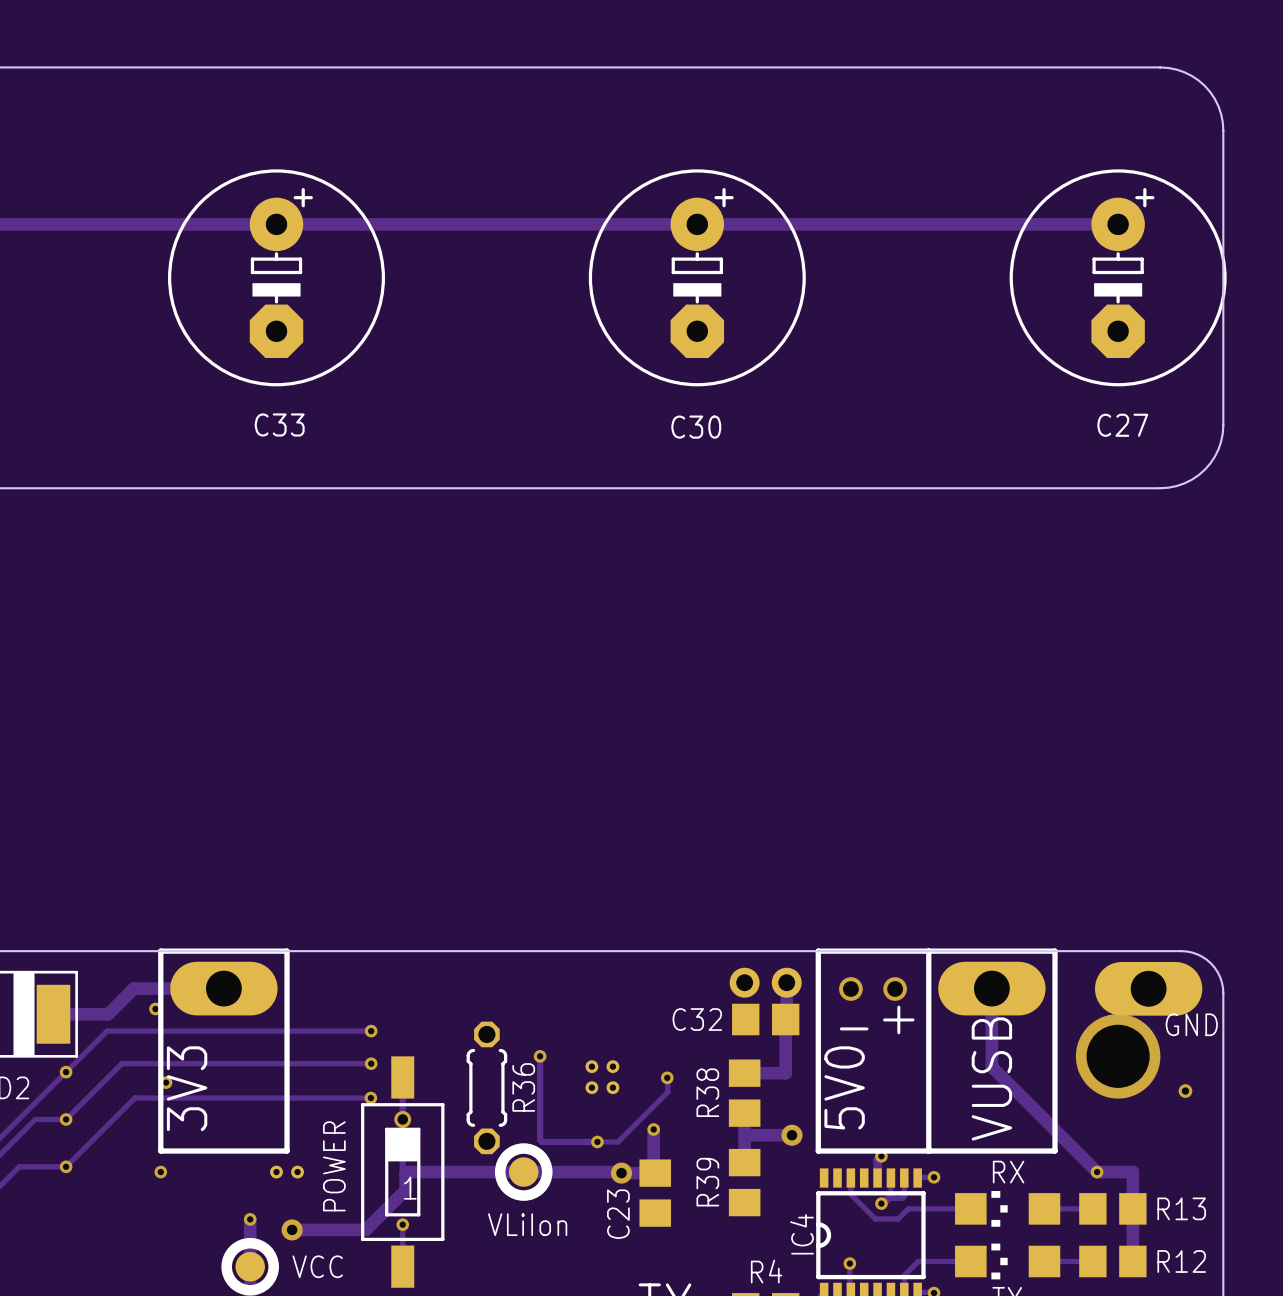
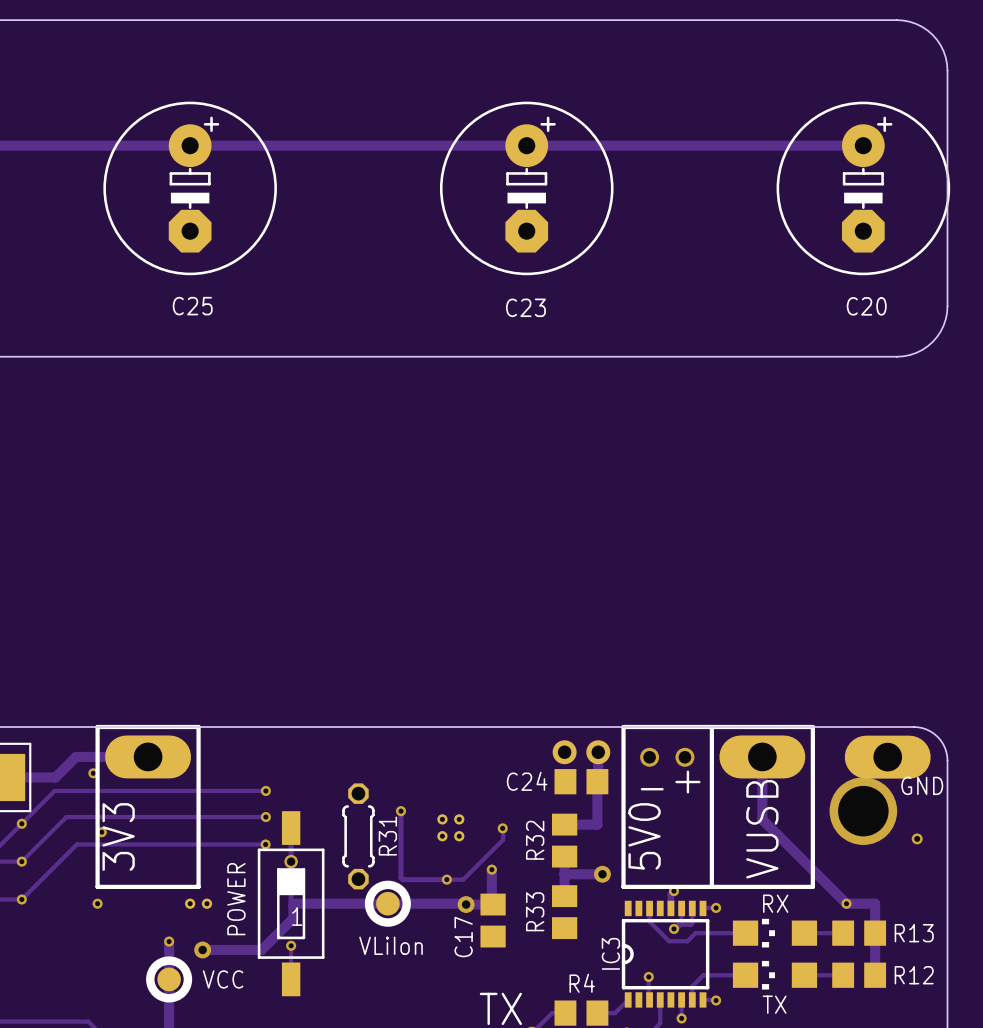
C33 name: C33 (279, 424) -> C25 (192, 306)
C27 name: C27 (1122, 425) -> C20 (866, 306)
C30 name: C30 (696, 427) -> C23 (525, 307)
C32 name: C32 (697, 1019) -> C24 (527, 781)
R36 name: R36 (523, 1087) -> R31 (387, 836)
R38 name: R38 (707, 1092) -> R32 (535, 840)
R39 name: R39 (707, 1182) -> R33 (535, 911)
C23 name: C23 (618, 1214) -> C17 (463, 937)
IC4 name: IC4 (802, 1234) -> IC3 (610, 953)

